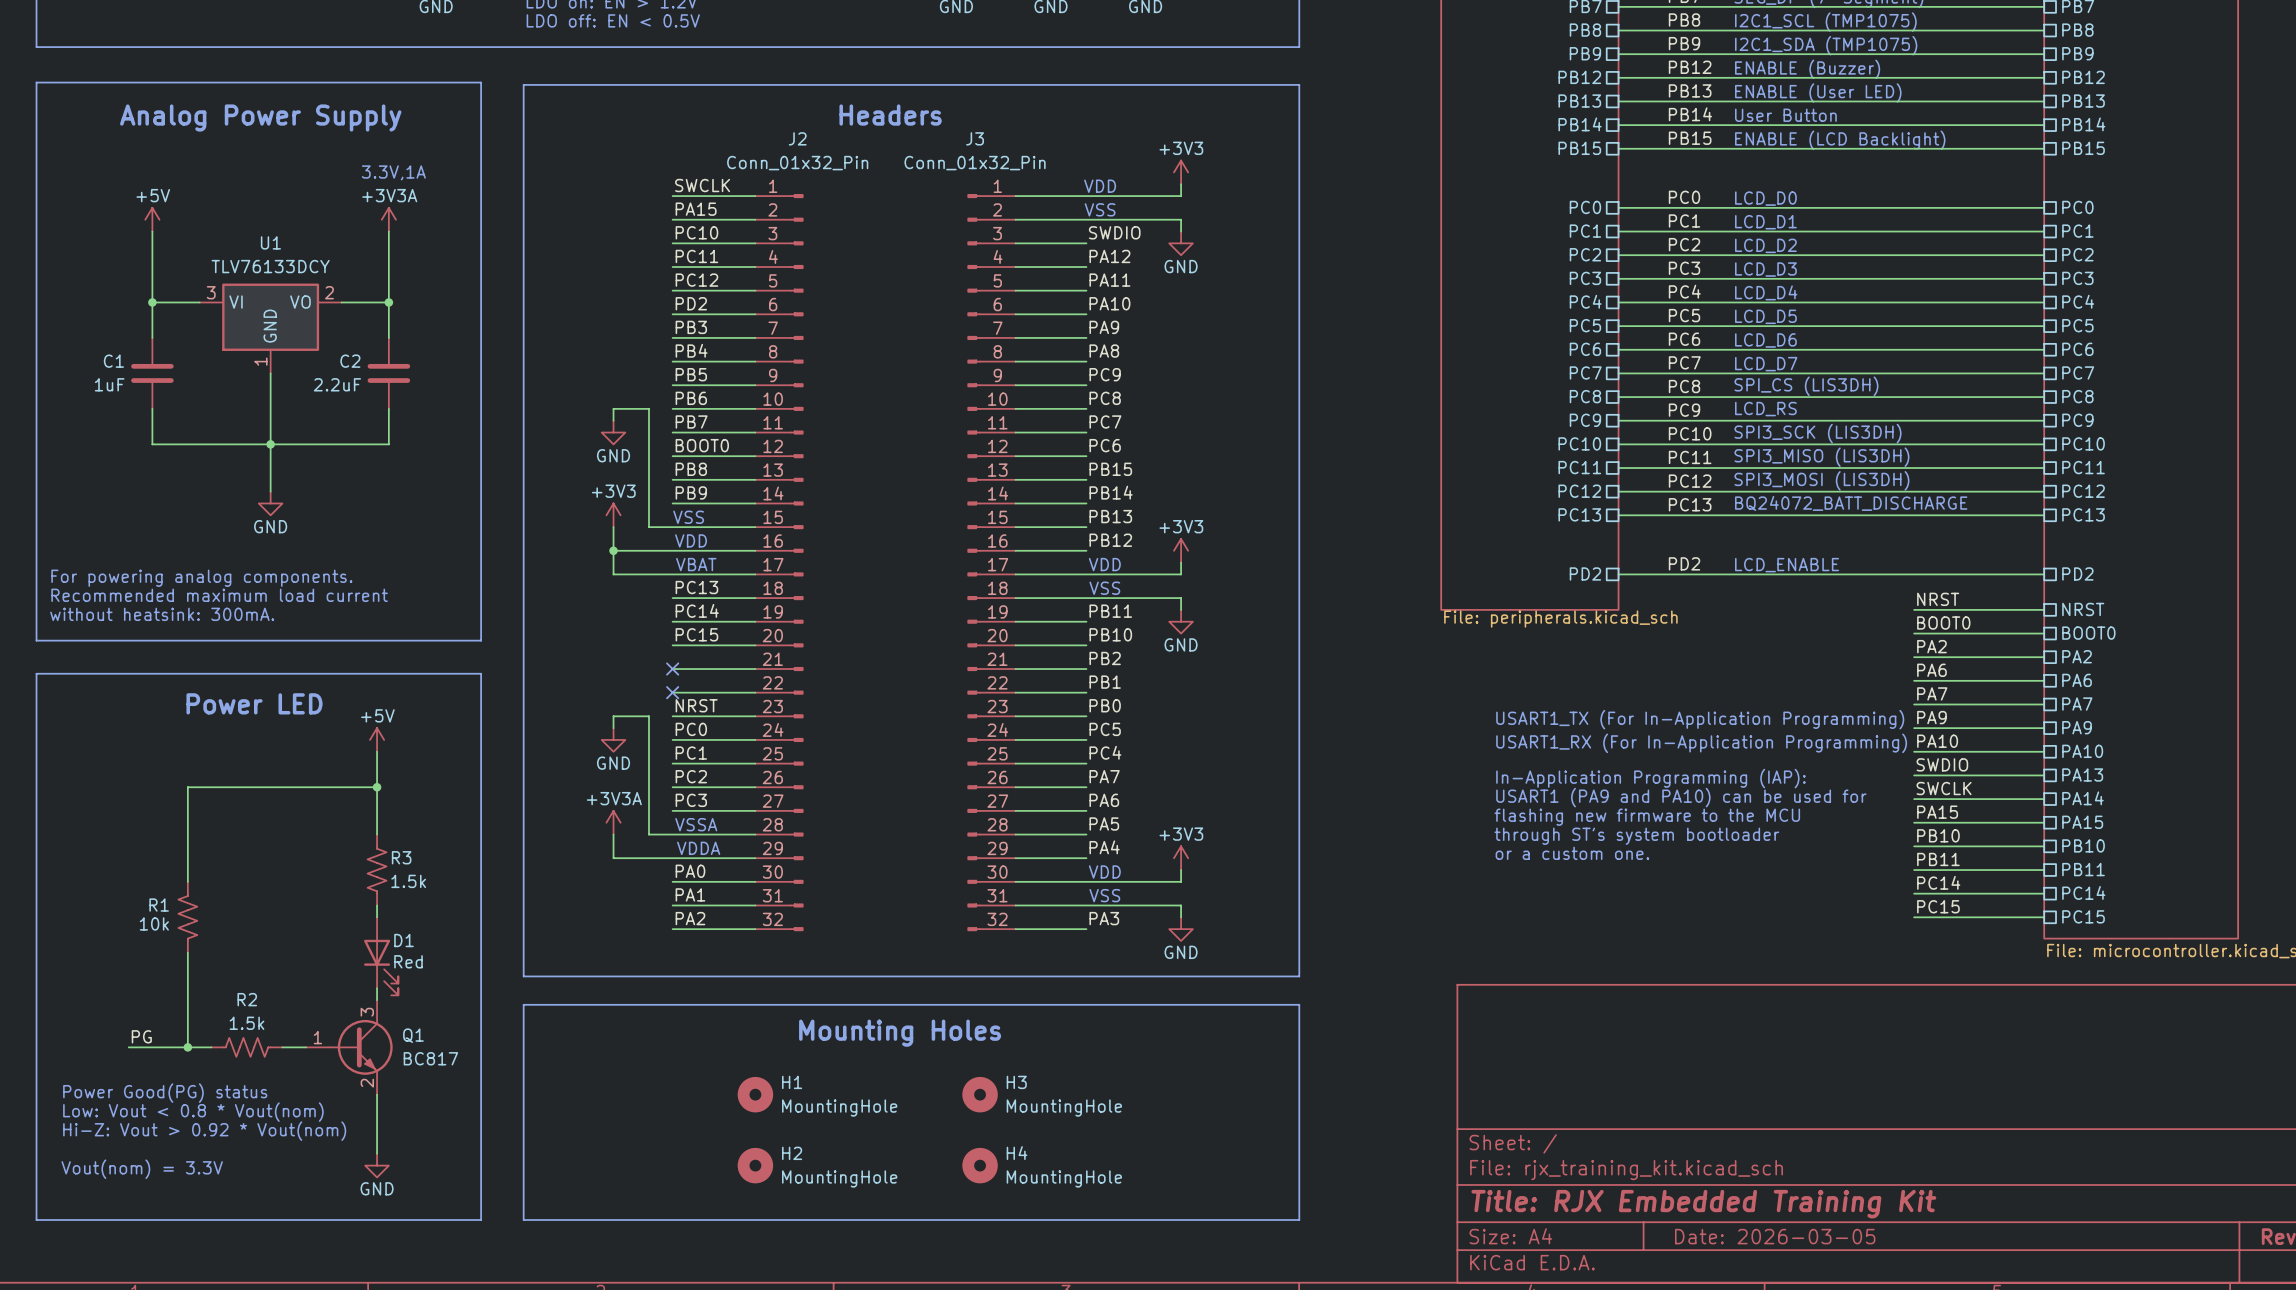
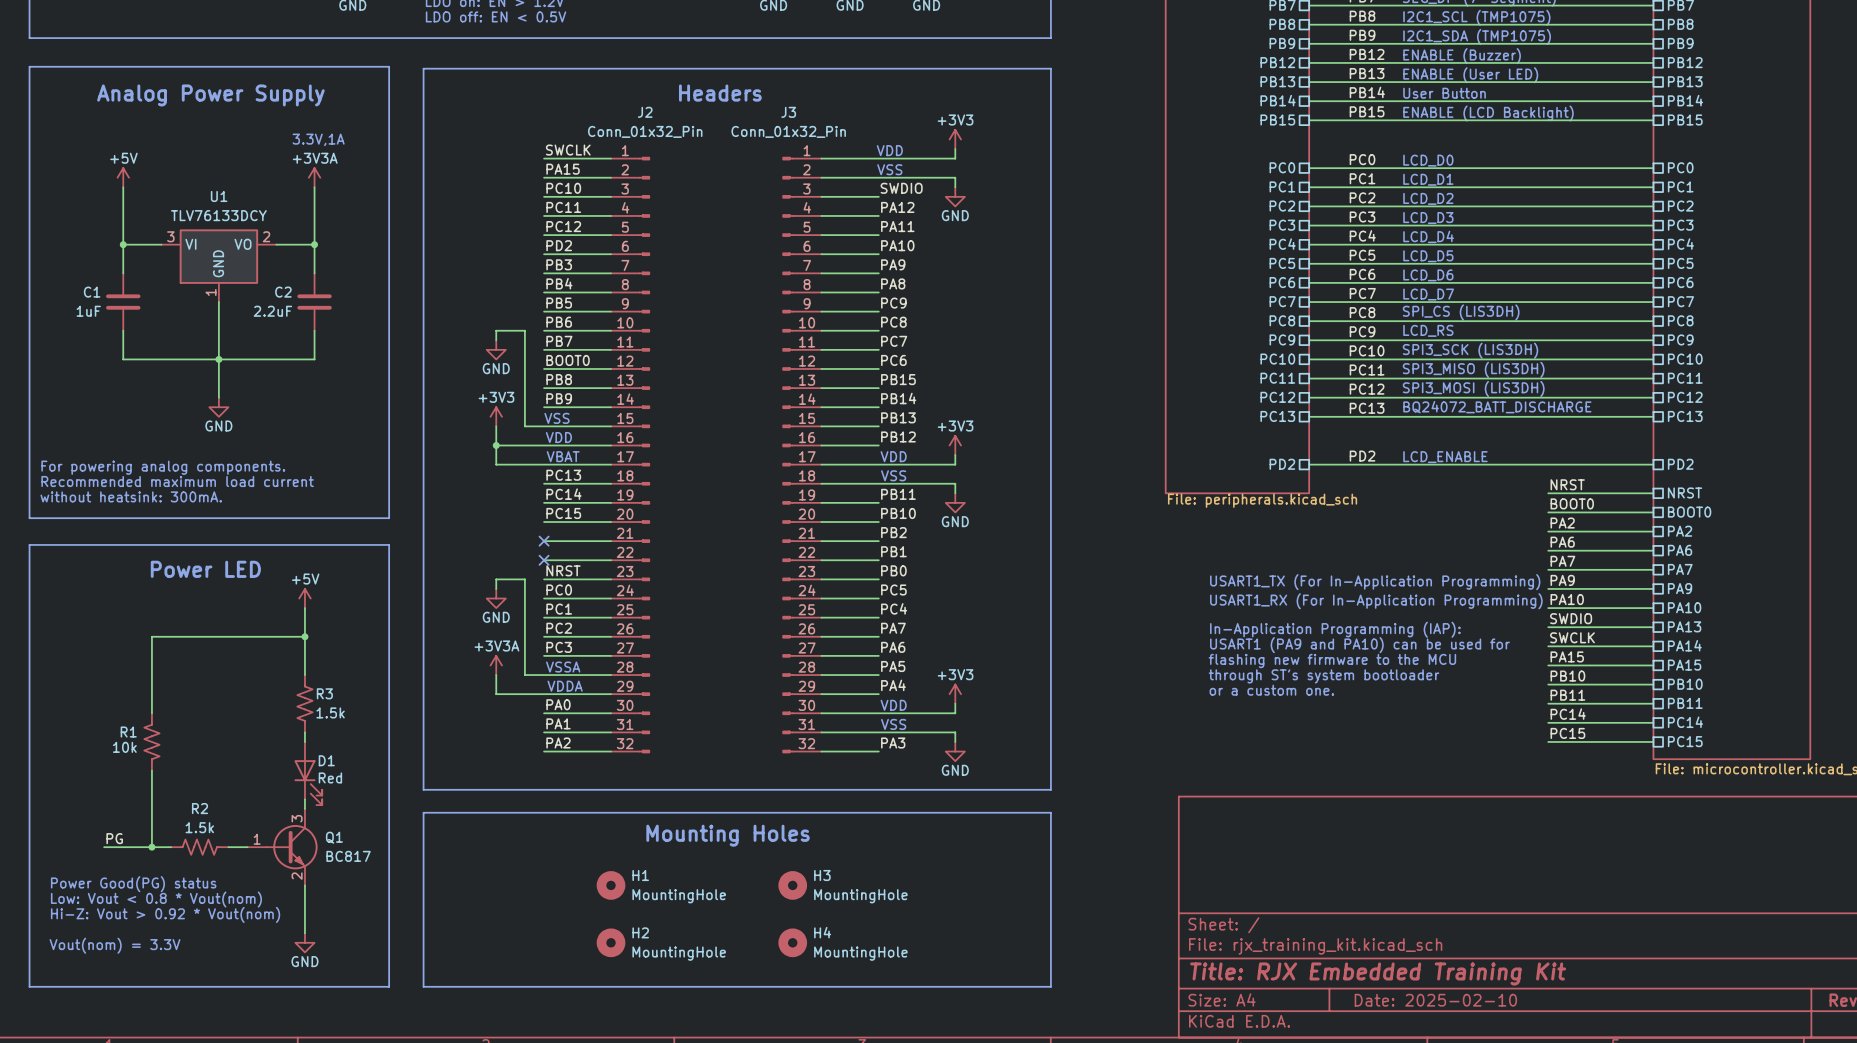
title block: Date: 2026-03-05 (1775, 1236) -> Date: 2025-02-10 (1435, 1000)

